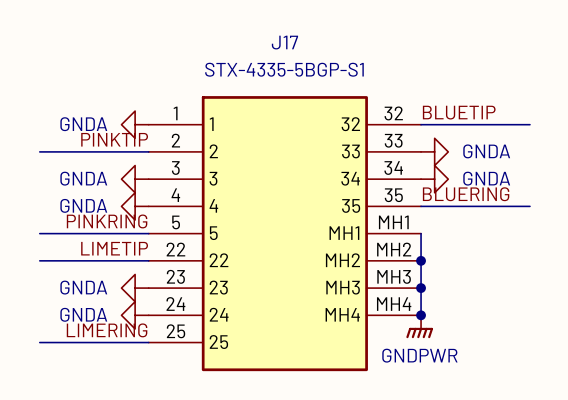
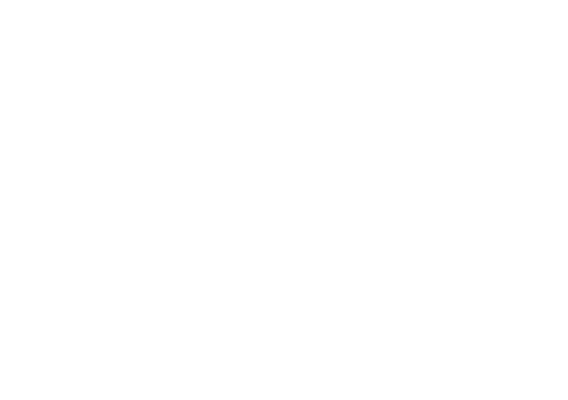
label: BLUETIP (459, 112) -> none
power symbol: GNDA (135, 124) -> none
wire: (421, 124) (529, 124) -> none
label: PINKTIP (114, 139) -> none
wire: (39, 151) (148, 151) -> none
power symbol: GNDA (434, 151) -> none
power symbol: GNDA (135, 179) -> none
power symbol: GNDA (434, 179) -> none
label: BLUERING (466, 194) -> none
power symbol: GNDA (135, 206) -> none
wire: (421, 206) (529, 206) -> none
label: PINKRING (107, 221) -> none
wire: (39, 233) (148, 233) -> none
J17: STX-4335-5BGP-S1 (284, 233) -> none
wire: (421, 233) (421, 315) -> none
label: LIMETIP (114, 248) -> none
wire: (39, 260) (148, 260) -> none
junction: (421, 260) -> none
power symbol: GNDA (135, 288) -> none
junction: (421, 288) -> none
power symbol: GNDA (135, 315) -> none
junction: (421, 315) -> none
power symbol: GNDPWR (419, 326) -> none
label: LIMERING (107, 330) -> none
wire: (39, 342) (148, 342) -> none

